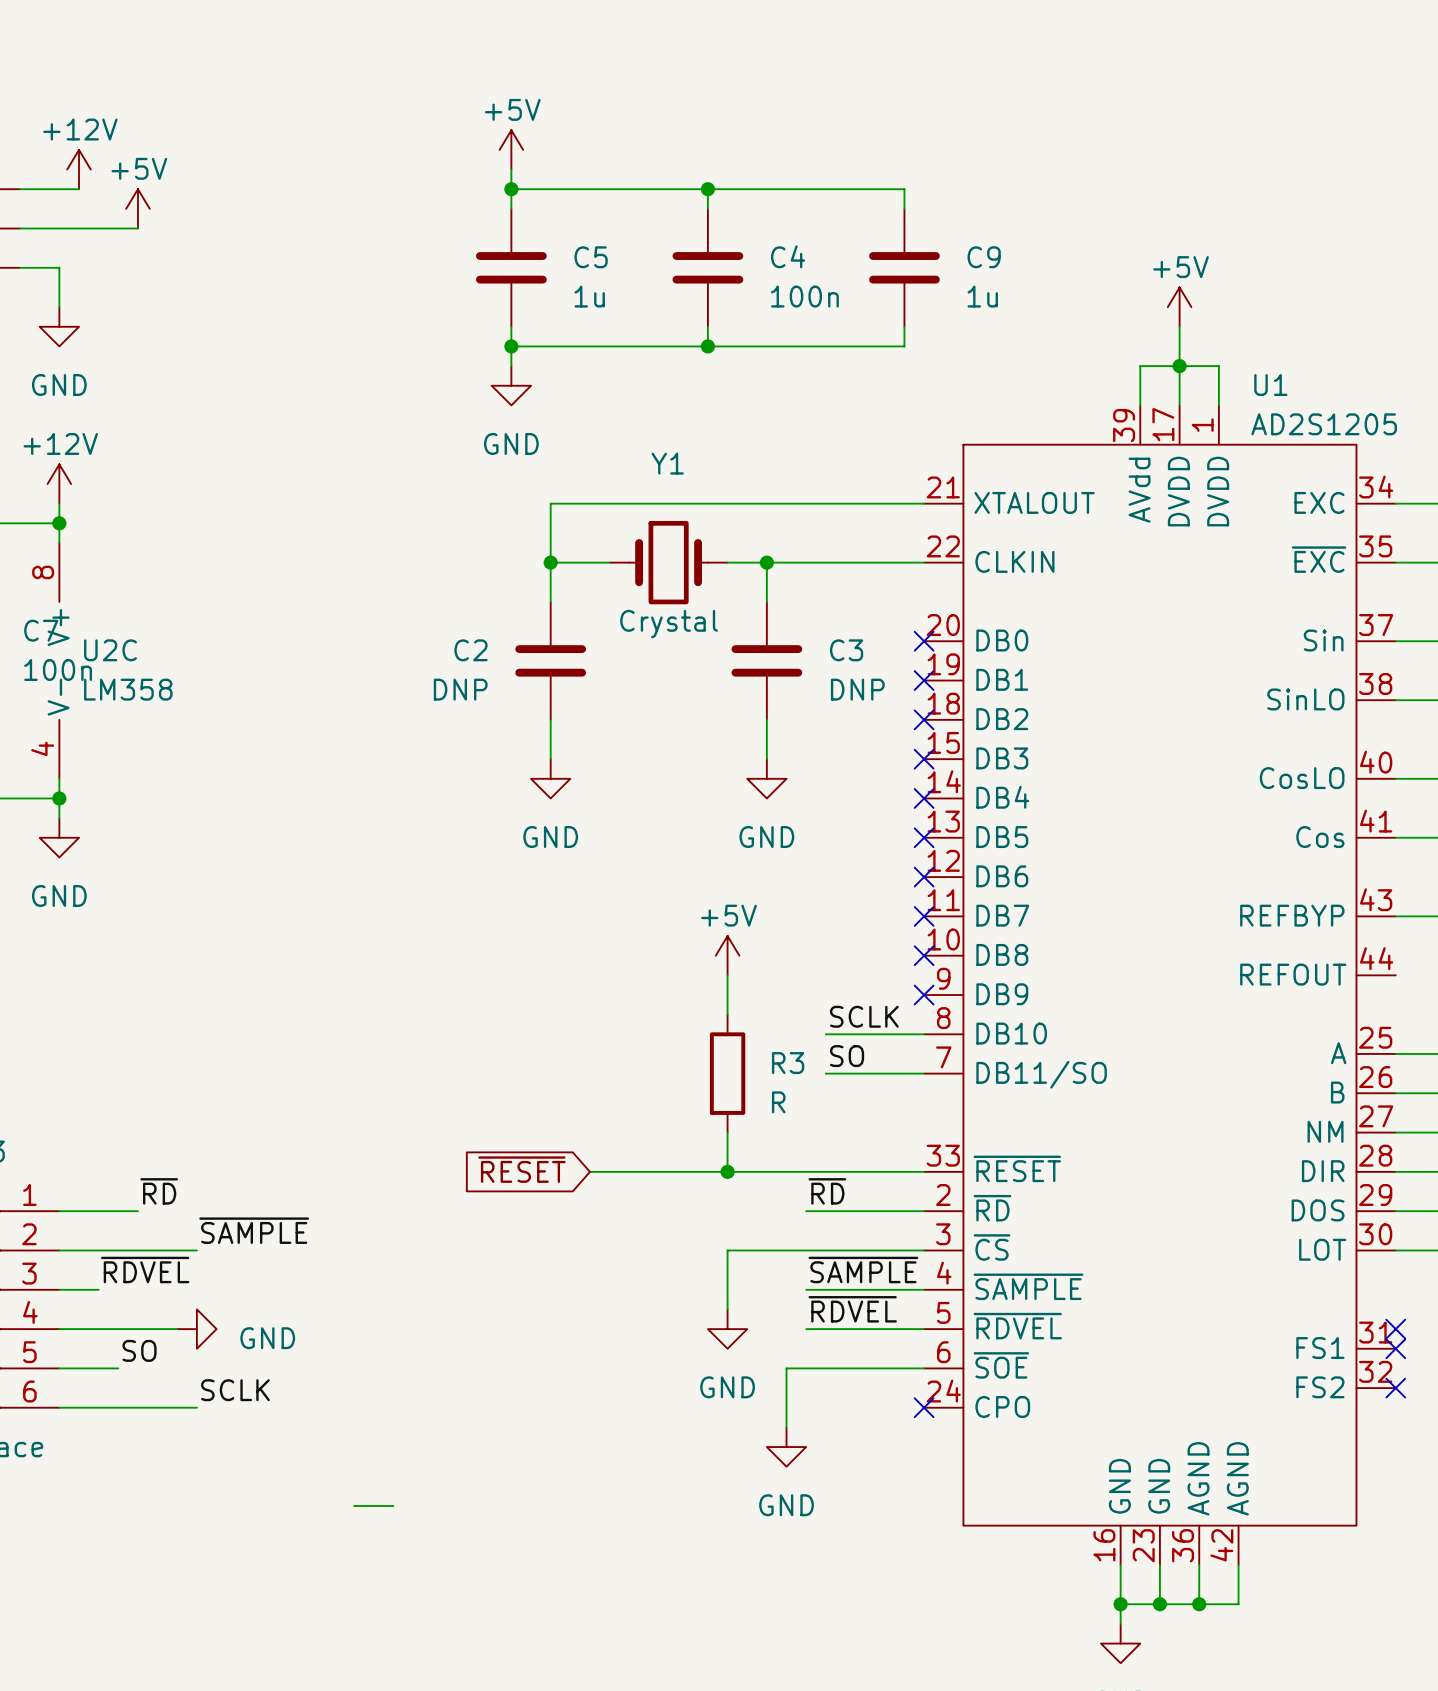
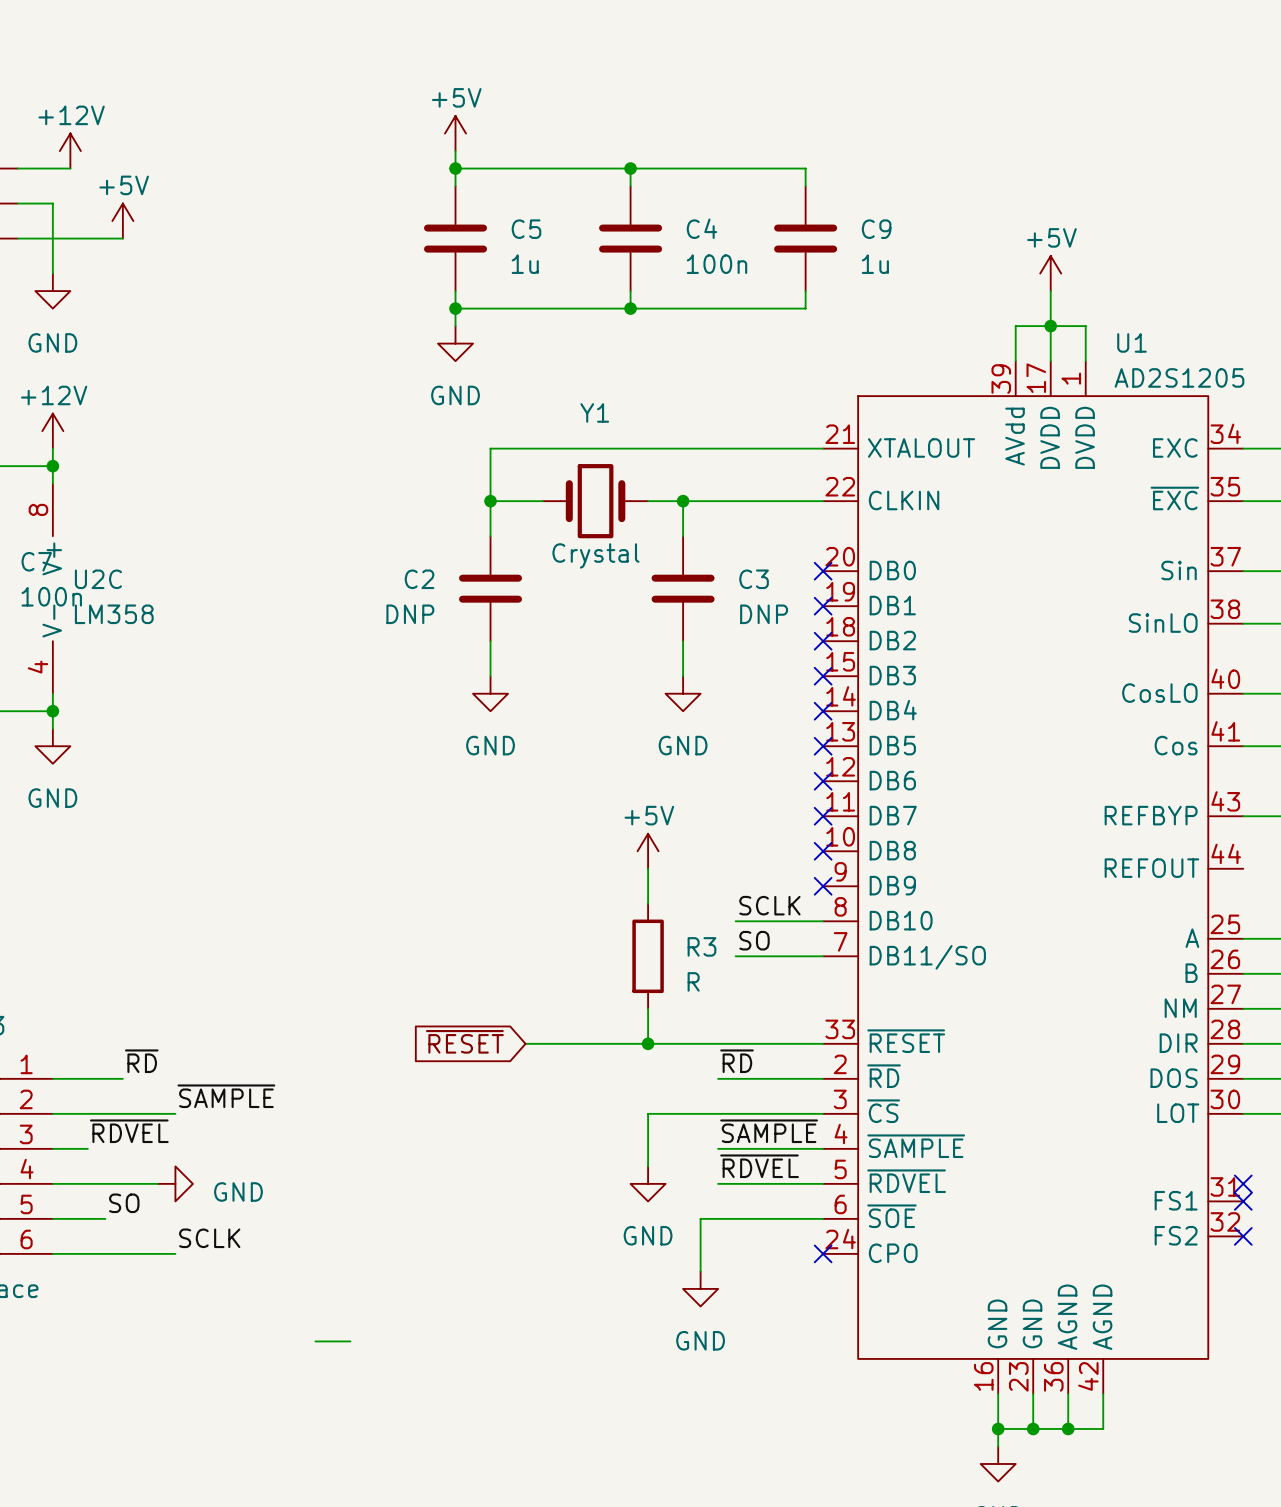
power symbol position: +5V (137, 208) -> +5V (122, 221)
wire: (59, 228) (137, 228) -> (52, 203) (52, 238) (122, 238)

